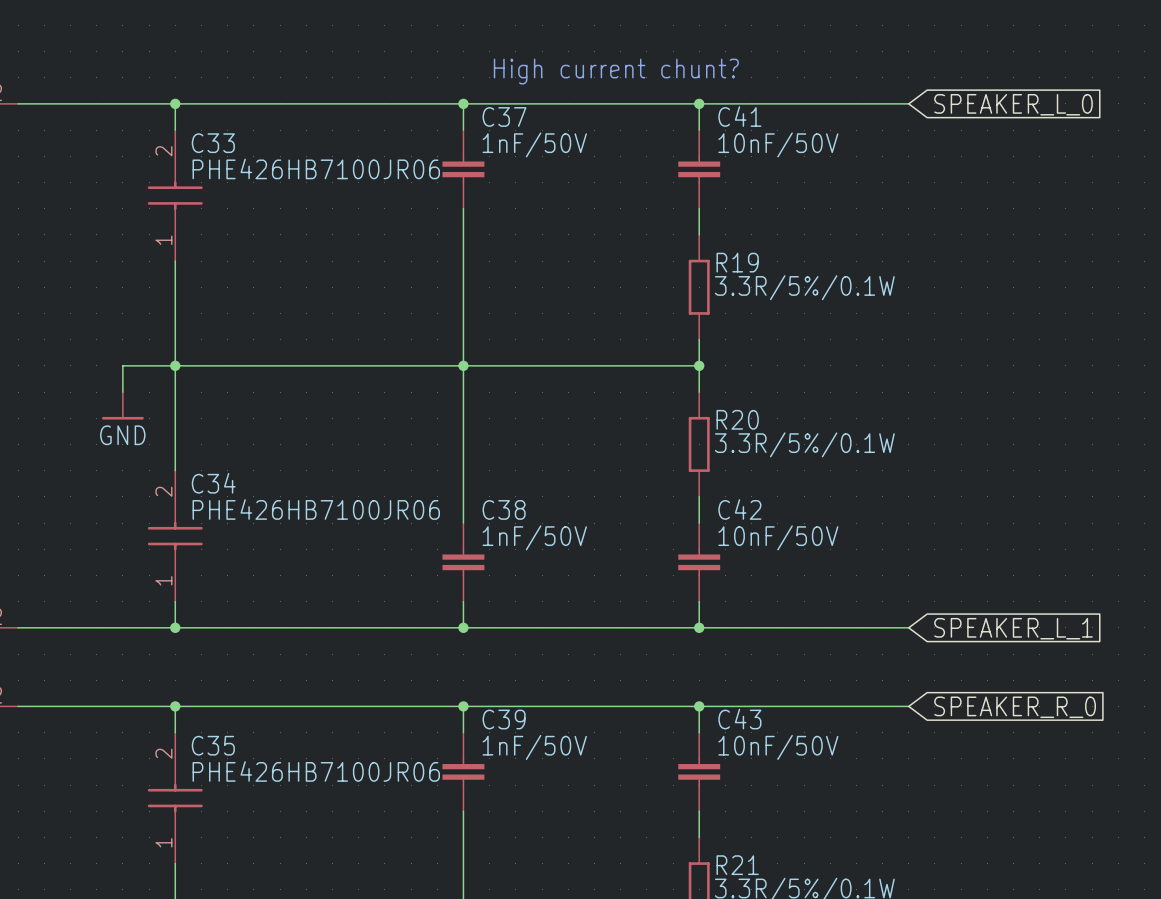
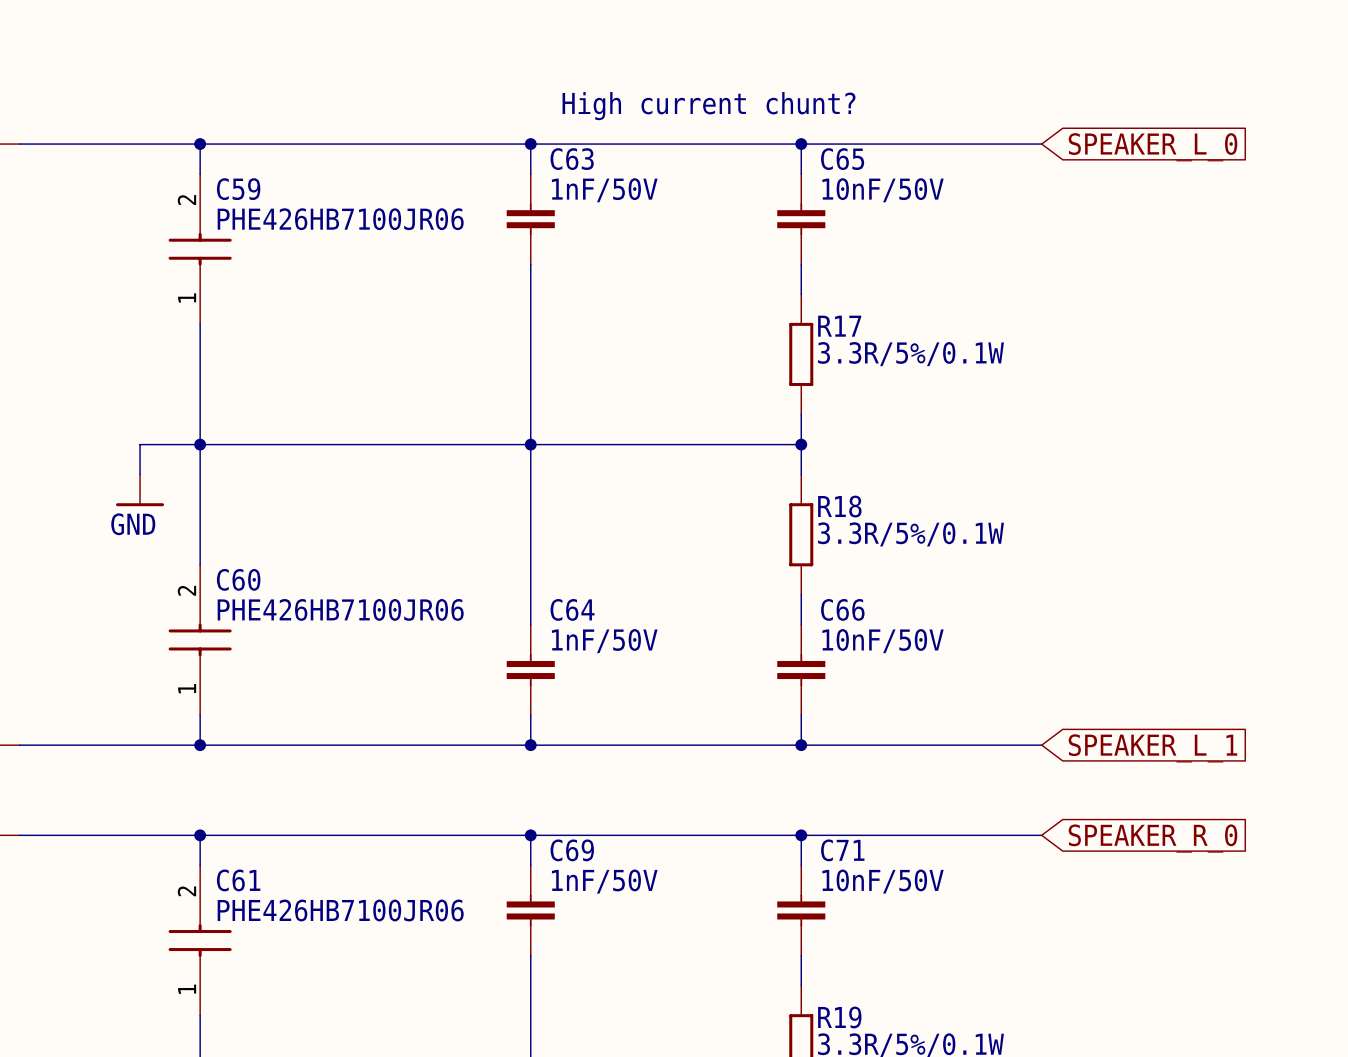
C37 name: C37 (504, 116) -> C63 (572, 159)
C41 name: C41 (739, 116) -> C65 (842, 159)
C33 name: C33 (213, 143) -> C59 (238, 189)
R19 name: R19 (737, 262) -> R17 (839, 326)
R20 name: R20 (737, 419) -> R18 (839, 506)
C34 name: C34 (213, 483) -> C60 (238, 579)
C38 name: C38 (504, 509) -> C64 (572, 609)
C42 name: C42 (739, 509) -> C66 (842, 609)
C39 name: C39 (504, 719) -> C69 (572, 850)
C43 name: C43 (739, 719) -> C71 (842, 850)
C35 name: C35 (213, 745) -> C61 (238, 880)
R21 name: R21 (737, 865) -> R19 (839, 1017)

